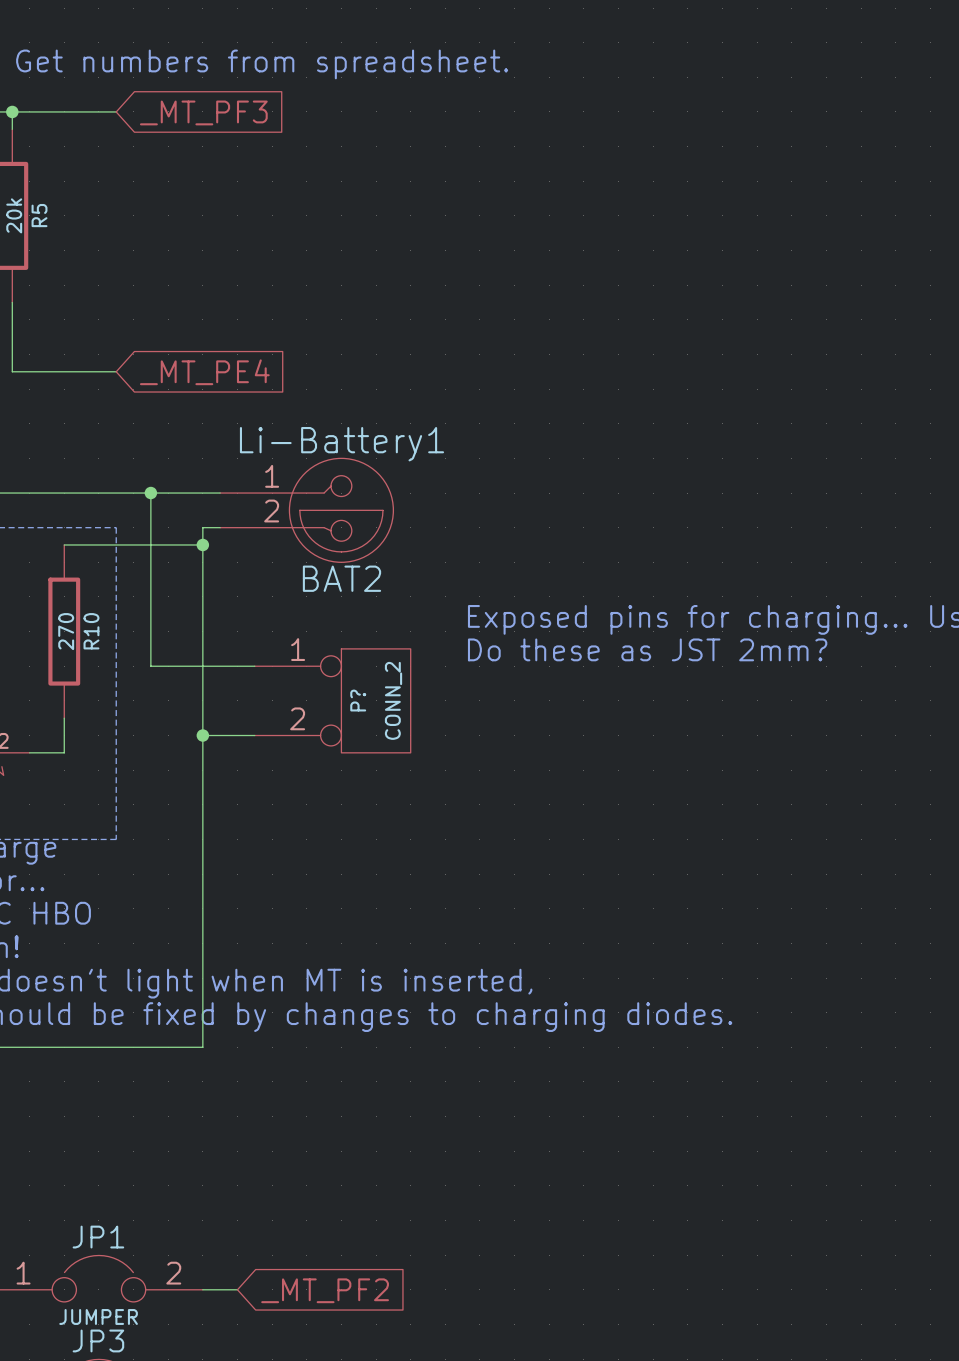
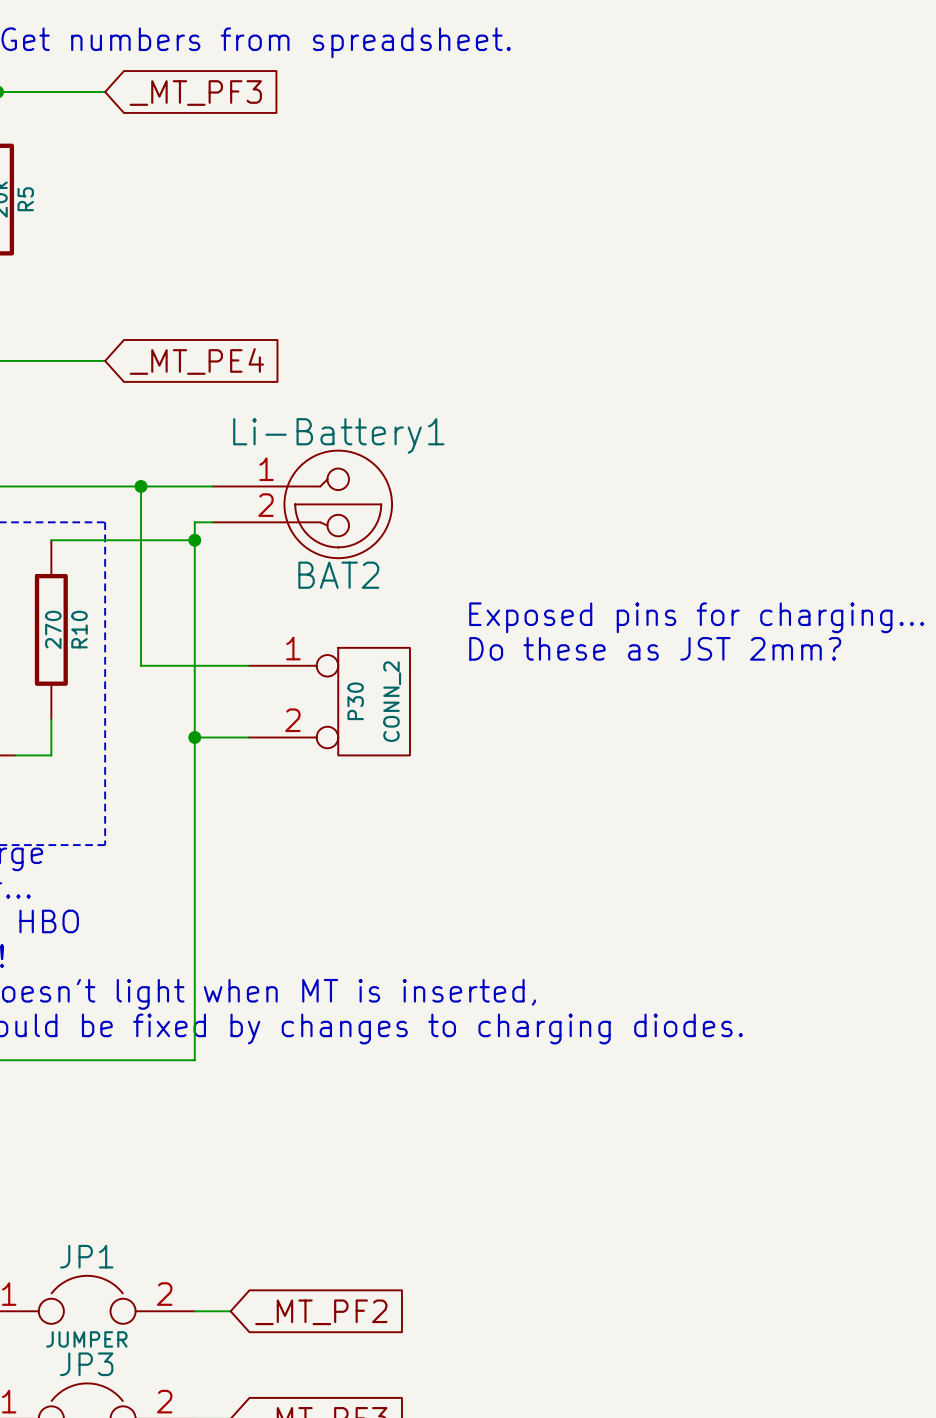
P? name: P? (358, 700) -> P30 (355, 701)

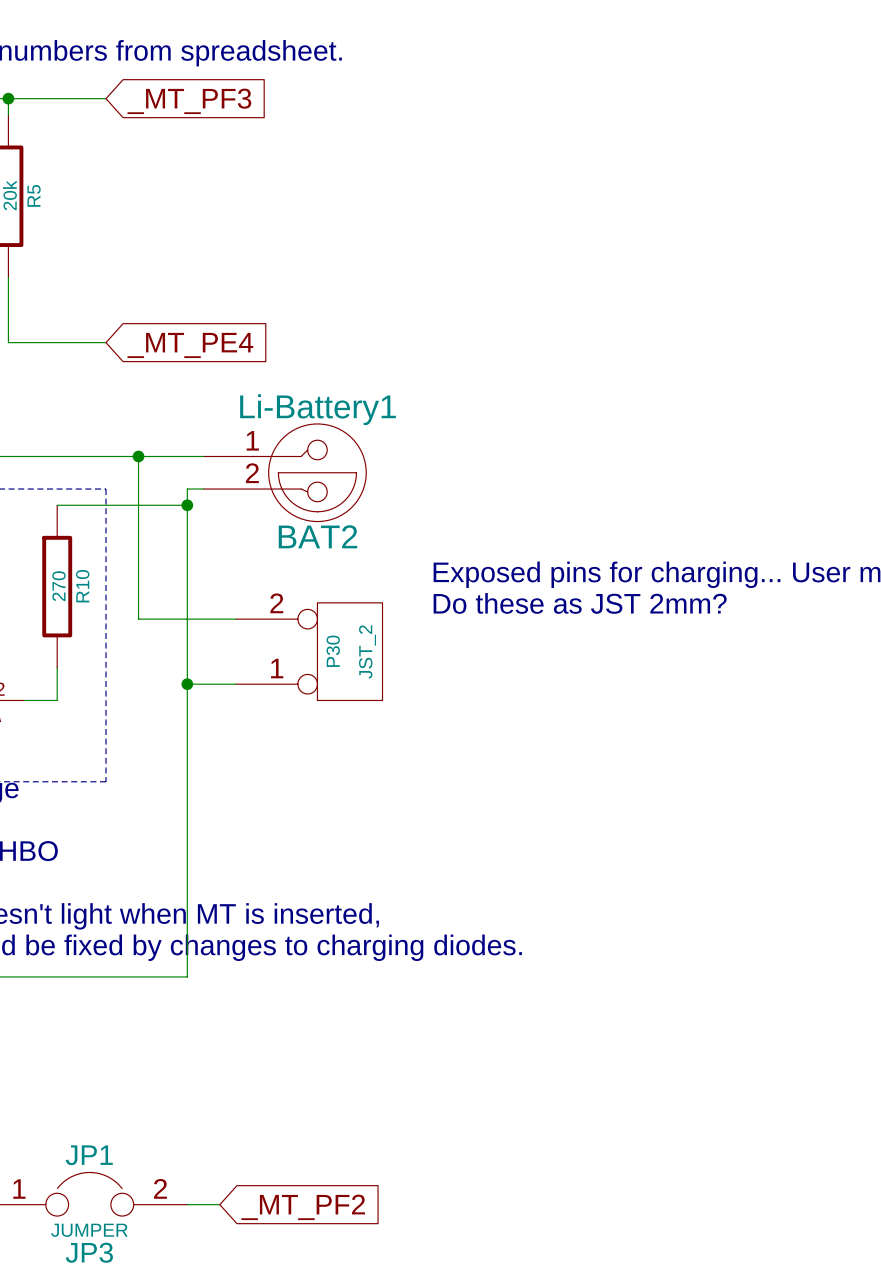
P30 flip: as is (374, 701) -> up-down (349, 651)
P30 value: CONN_2 (392, 701) -> JST_2 (367, 651)

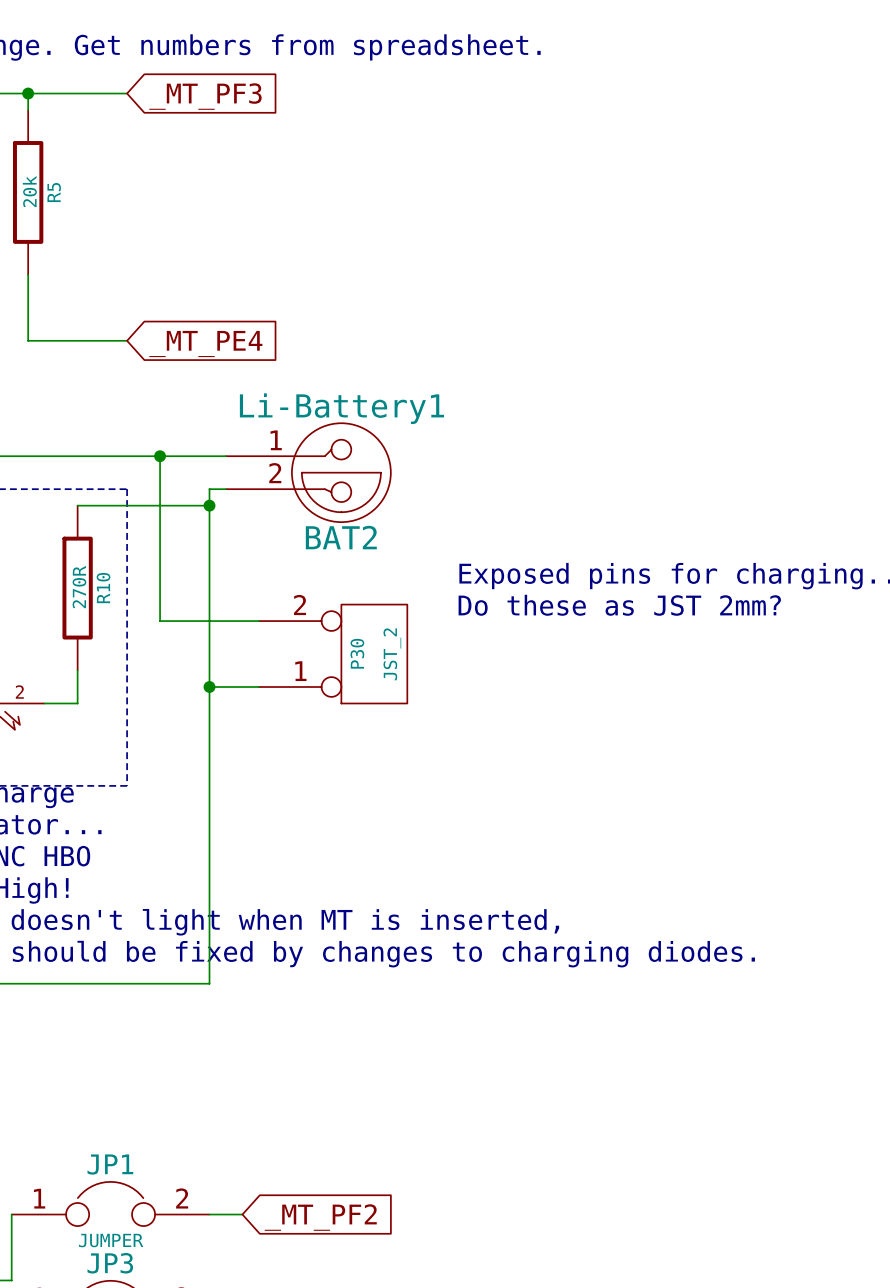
R10 value: 270 (58, 586) -> 270R (79, 587)

